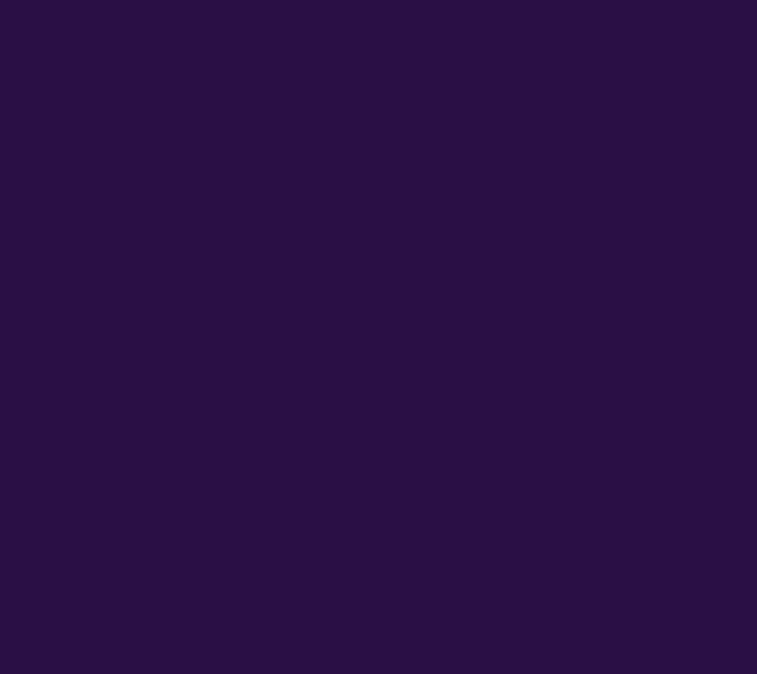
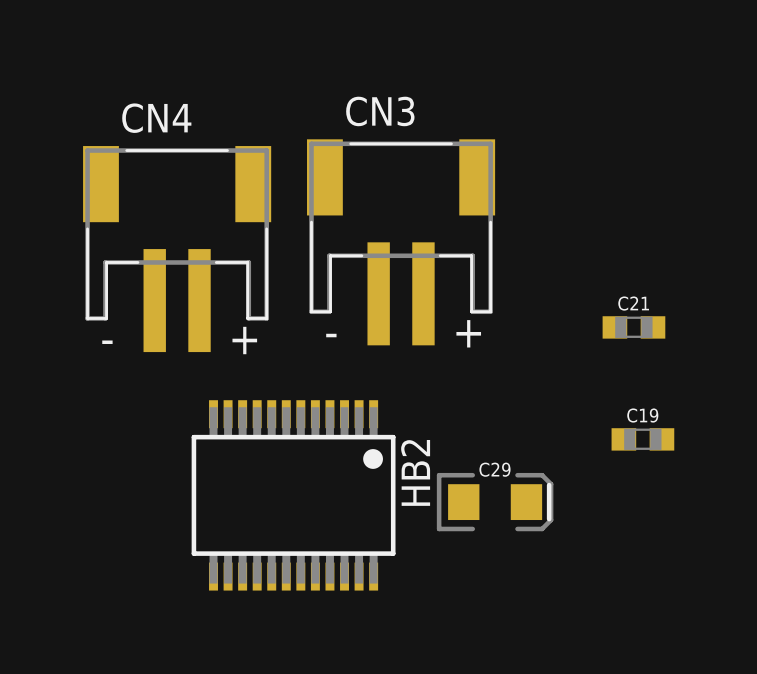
CN3: none -> (401, 242)
CN4: none -> (177, 249)
C21: none -> (633, 327)
C19: none -> (642, 439)
HB2: none -> (293, 495)
C29: none -> (495, 502)

